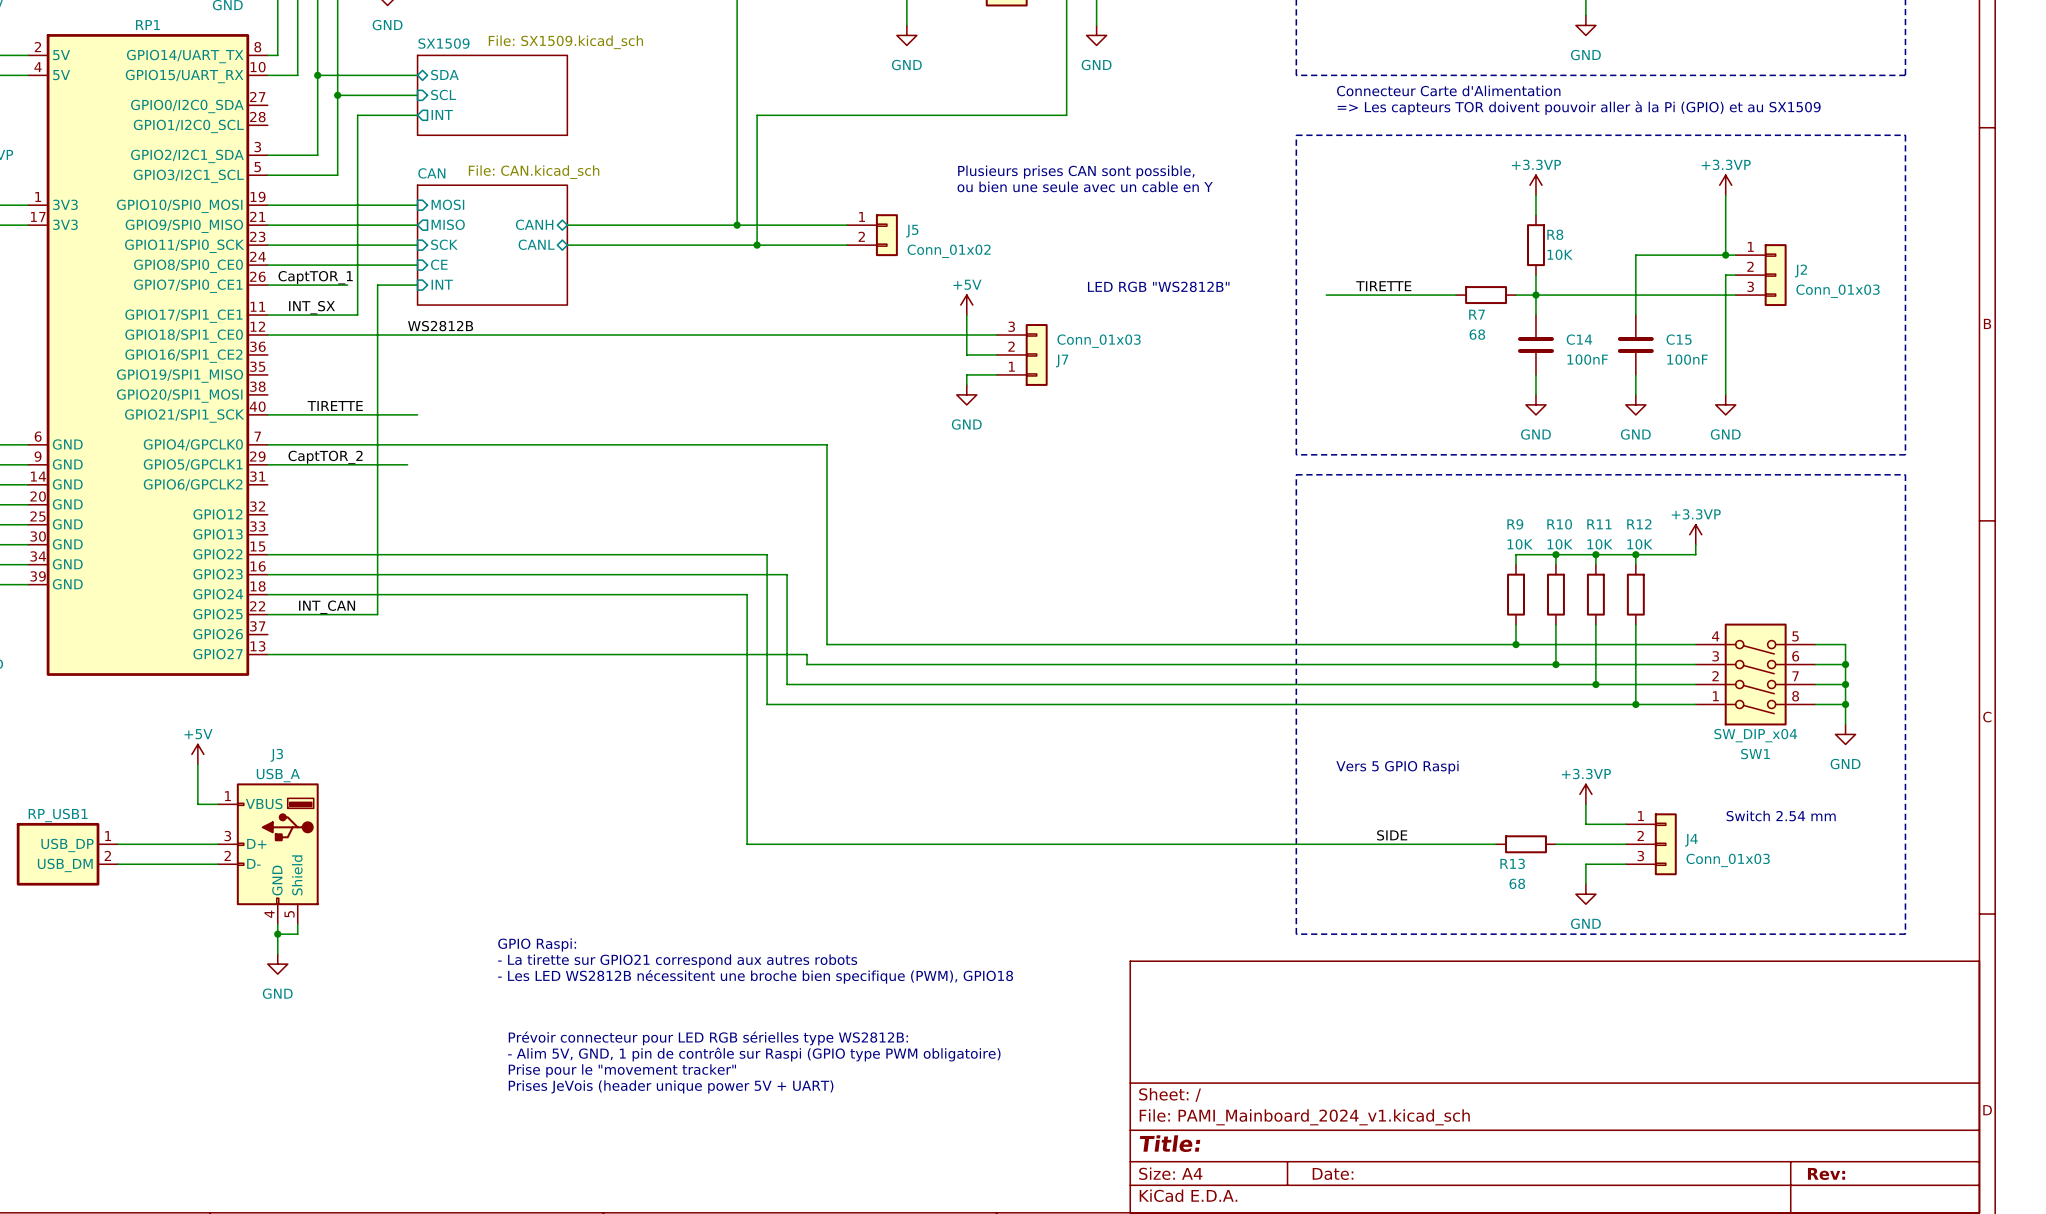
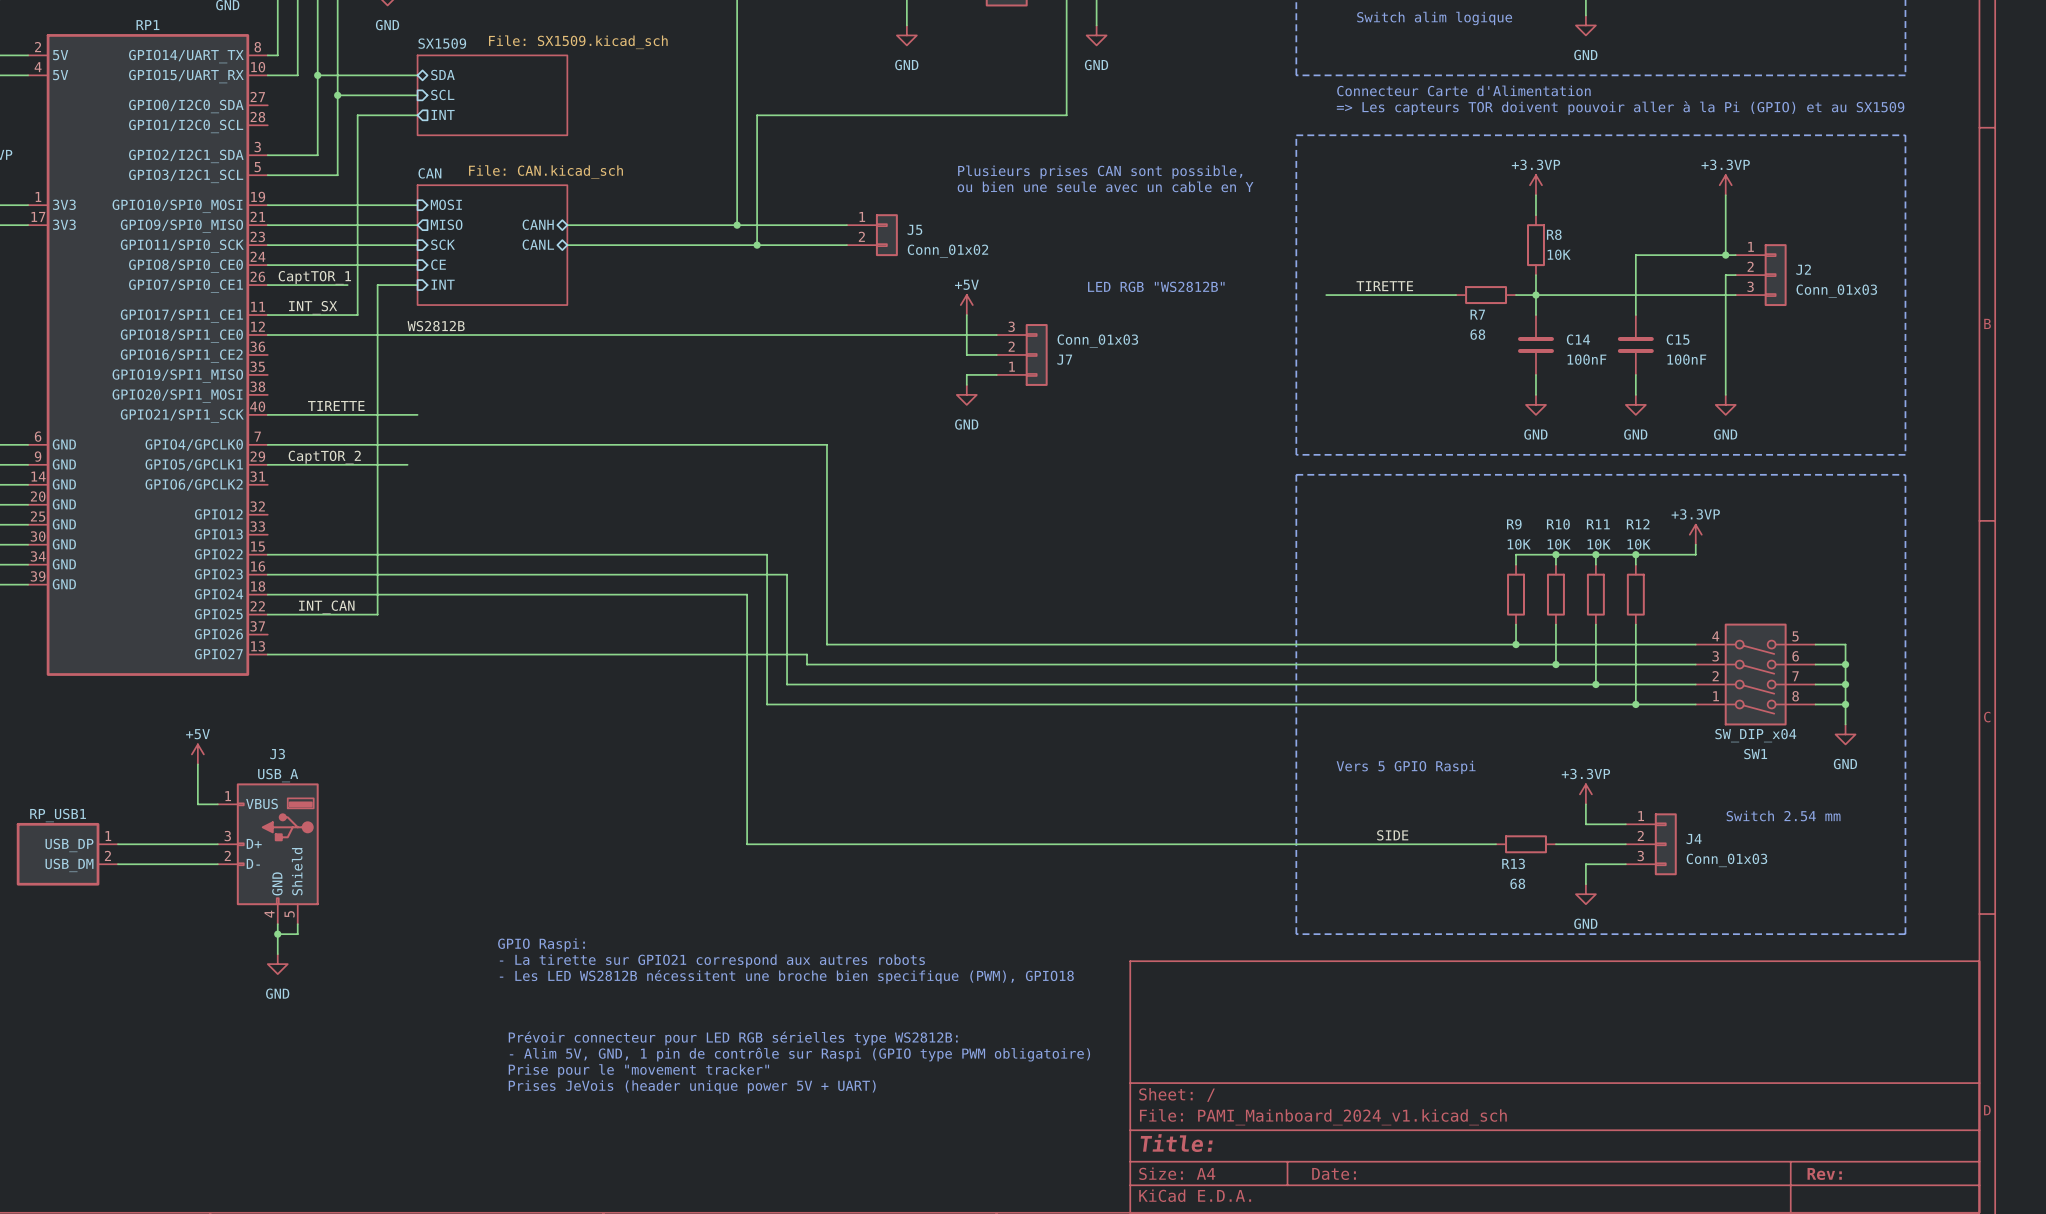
text: none -> Switch alim logique (1434, 18)

